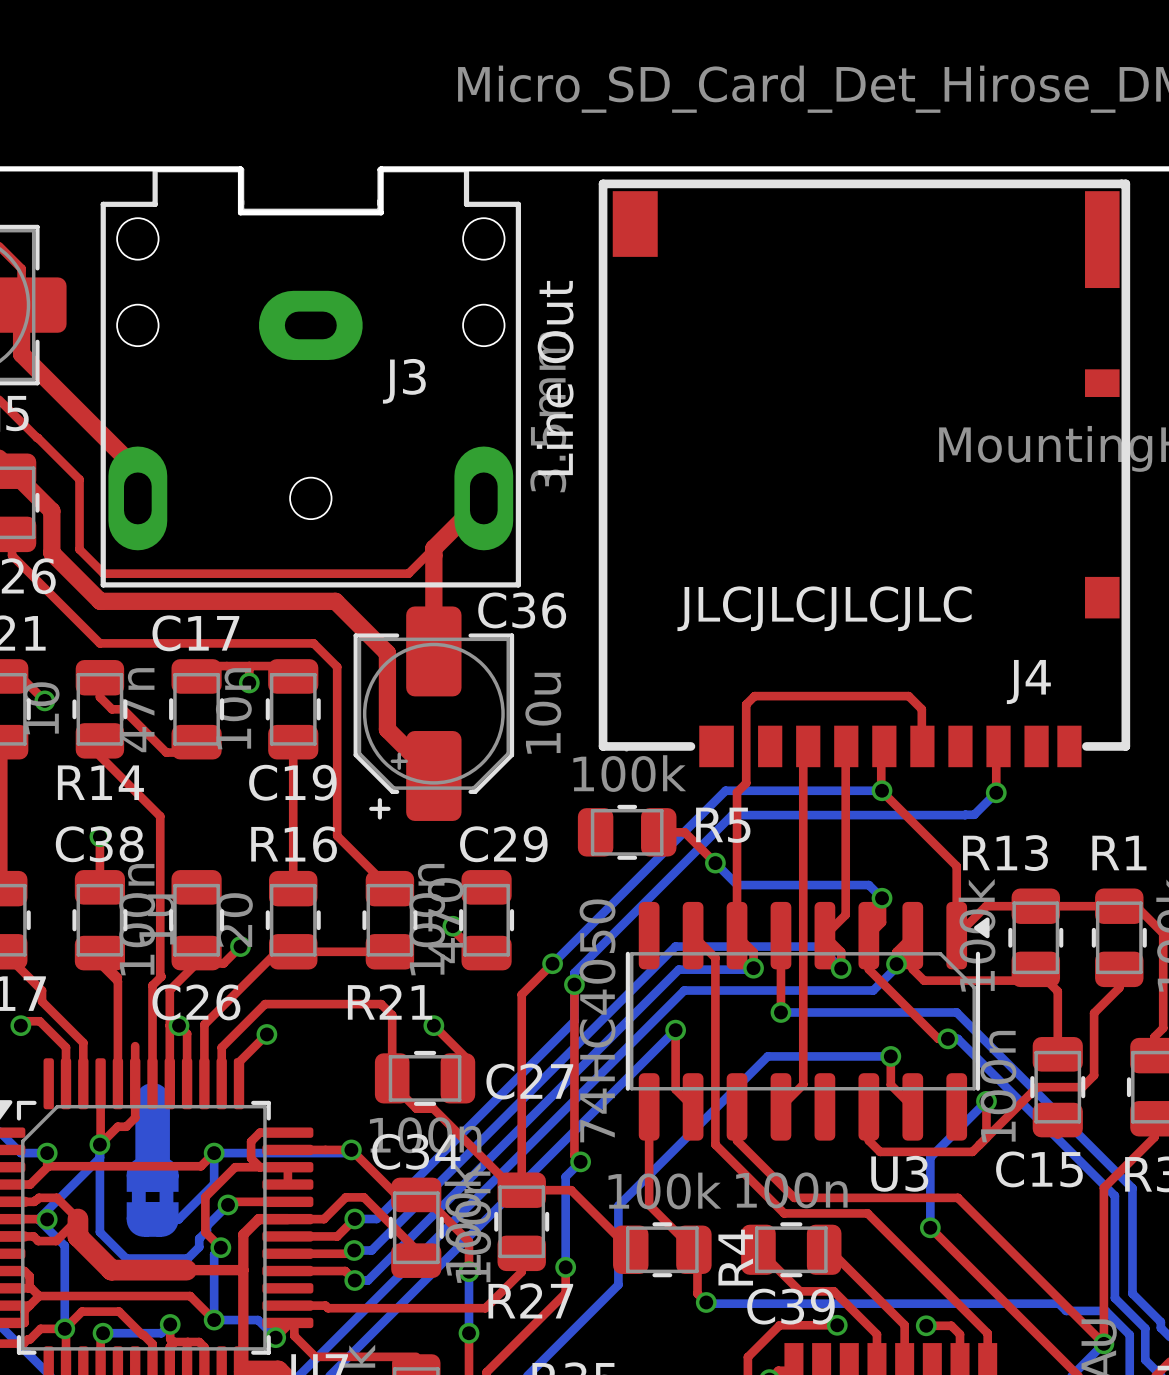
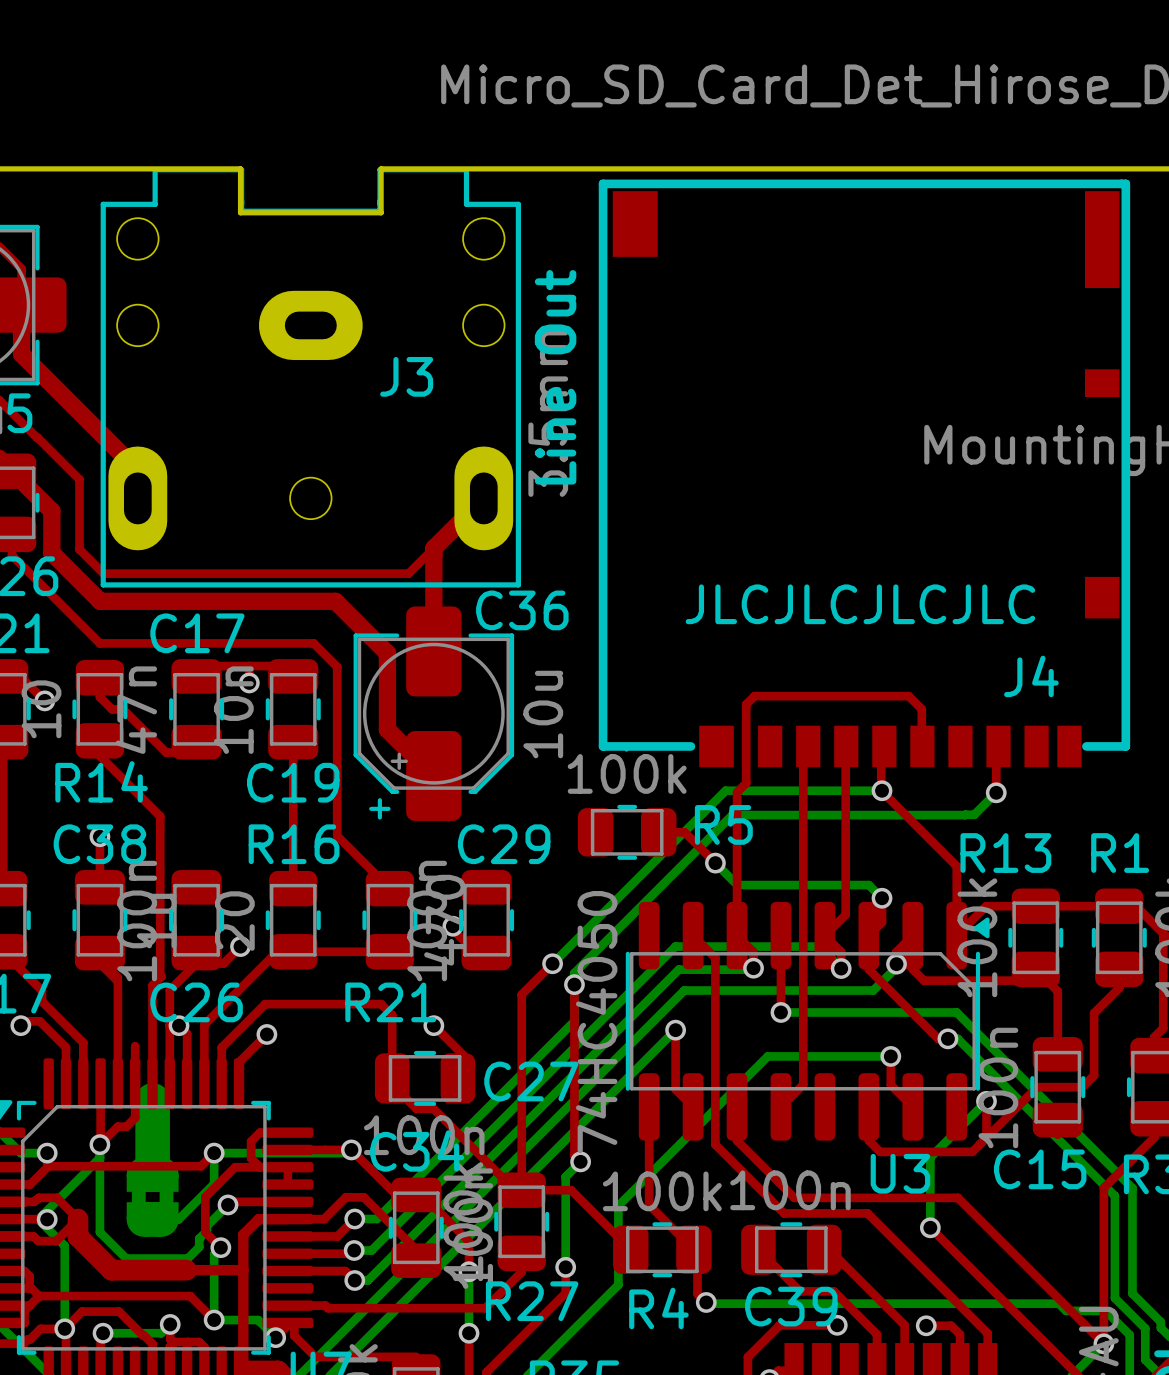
R4 name rotation: 0° (735, 1257) -> 90° clockwise (658, 1308)
R4 name position: R4 (735, 1257) -> R4 (658, 1308)

